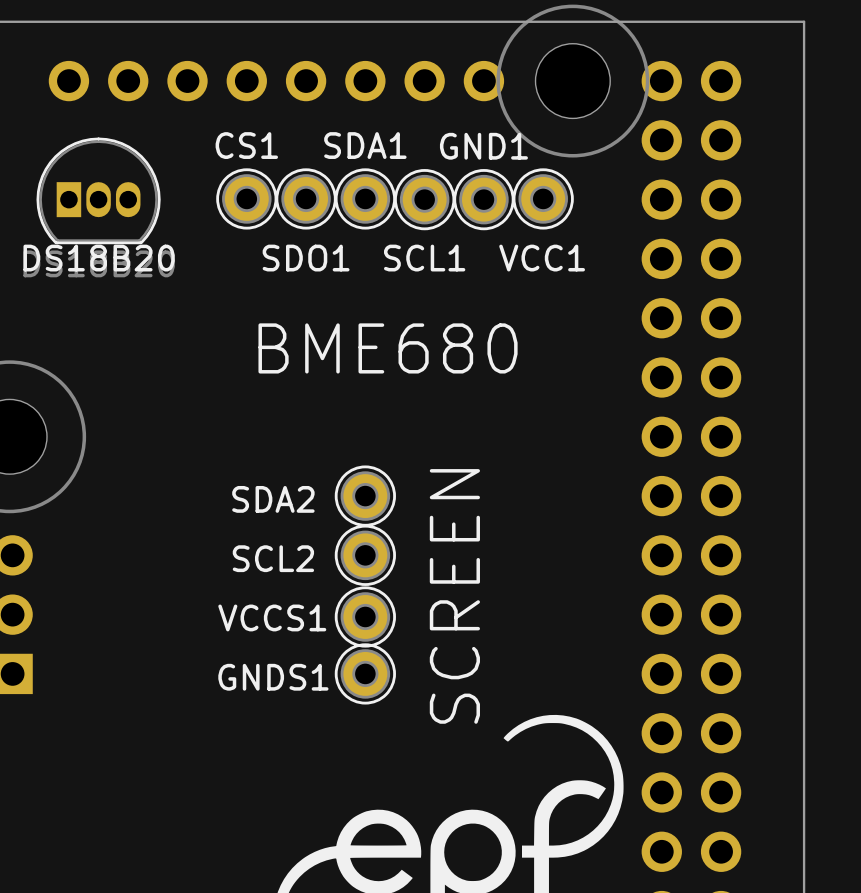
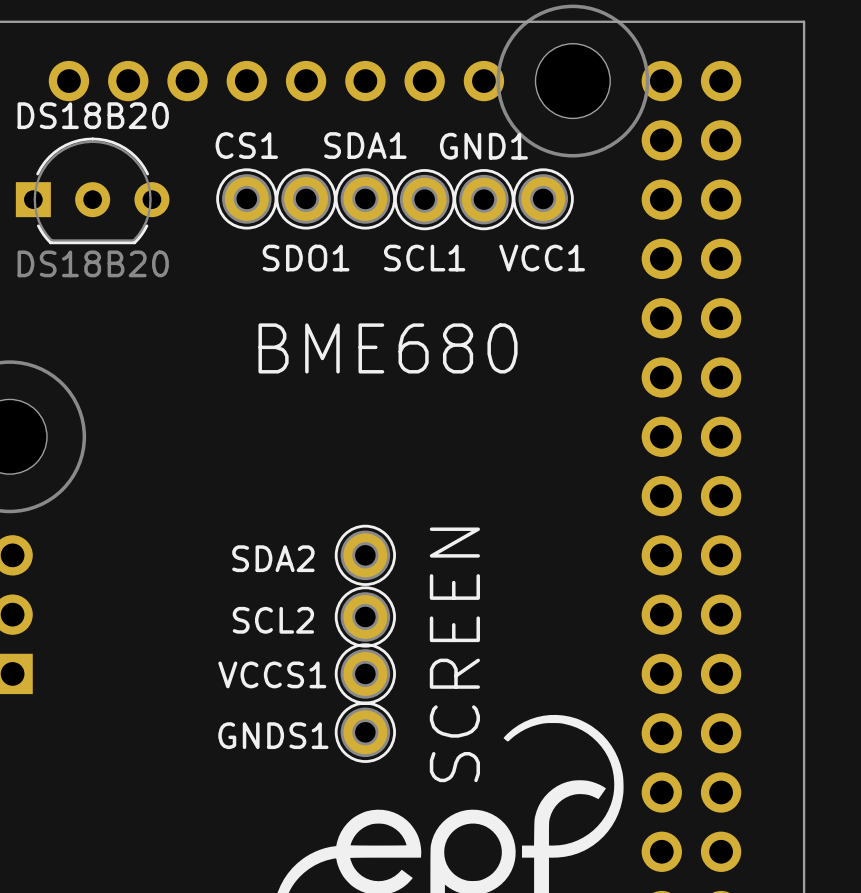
DS18B20 footprint: [36, 137, 161, 245] -> [15, 137, 170, 245]
DS18B20 name position: DS18B20 (99, 258) -> DS18B20 (93, 115)
SDA2: (365, 496) -> none
SCL2 name: SCL2 (273, 558) -> SDA2 (273, 558)
text position: SCREEN (454, 596) -> SCREEN (454, 654)
VCCS1 name: VCCS1 (272, 617) -> SCL2 (273, 620)
GNDS1 name: GNDS1 (273, 677) -> VCCS1 (272, 674)
GNDS1: none -> (365, 732)

